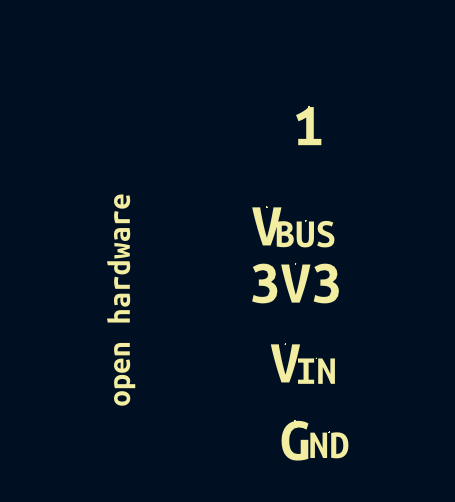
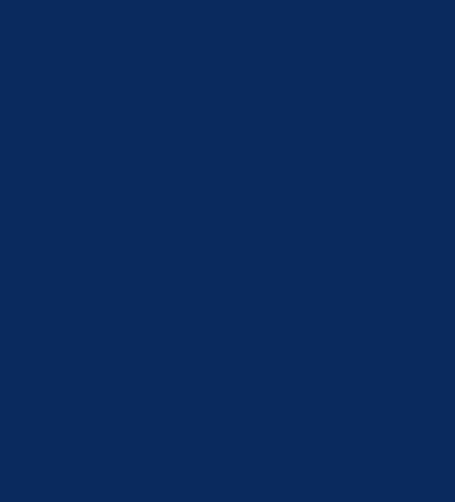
part: (308, 126) -> none
drawing: [107, 194, 136, 406] -> none
part: (266, 226) -> none
part: (305, 234) -> none
part: (295, 283) -> none
part: (285, 363) -> none
part: (316, 371) -> none
part: (295, 440) -> none
part: (329, 445) -> none

